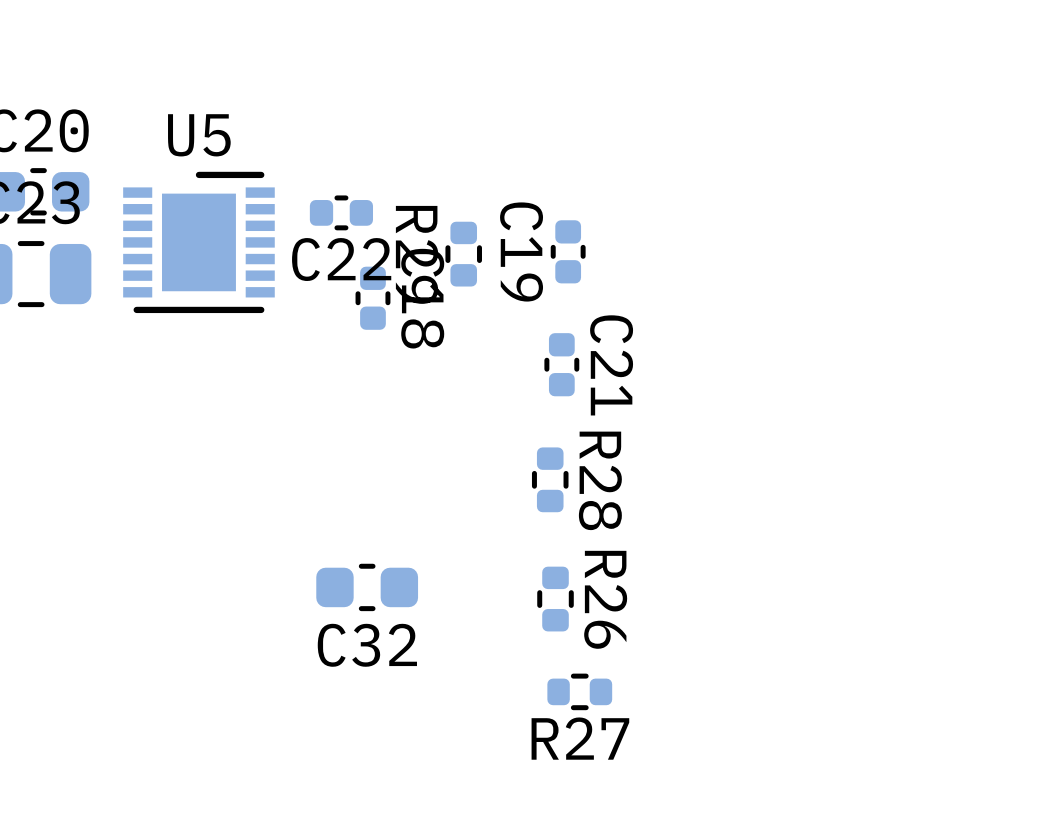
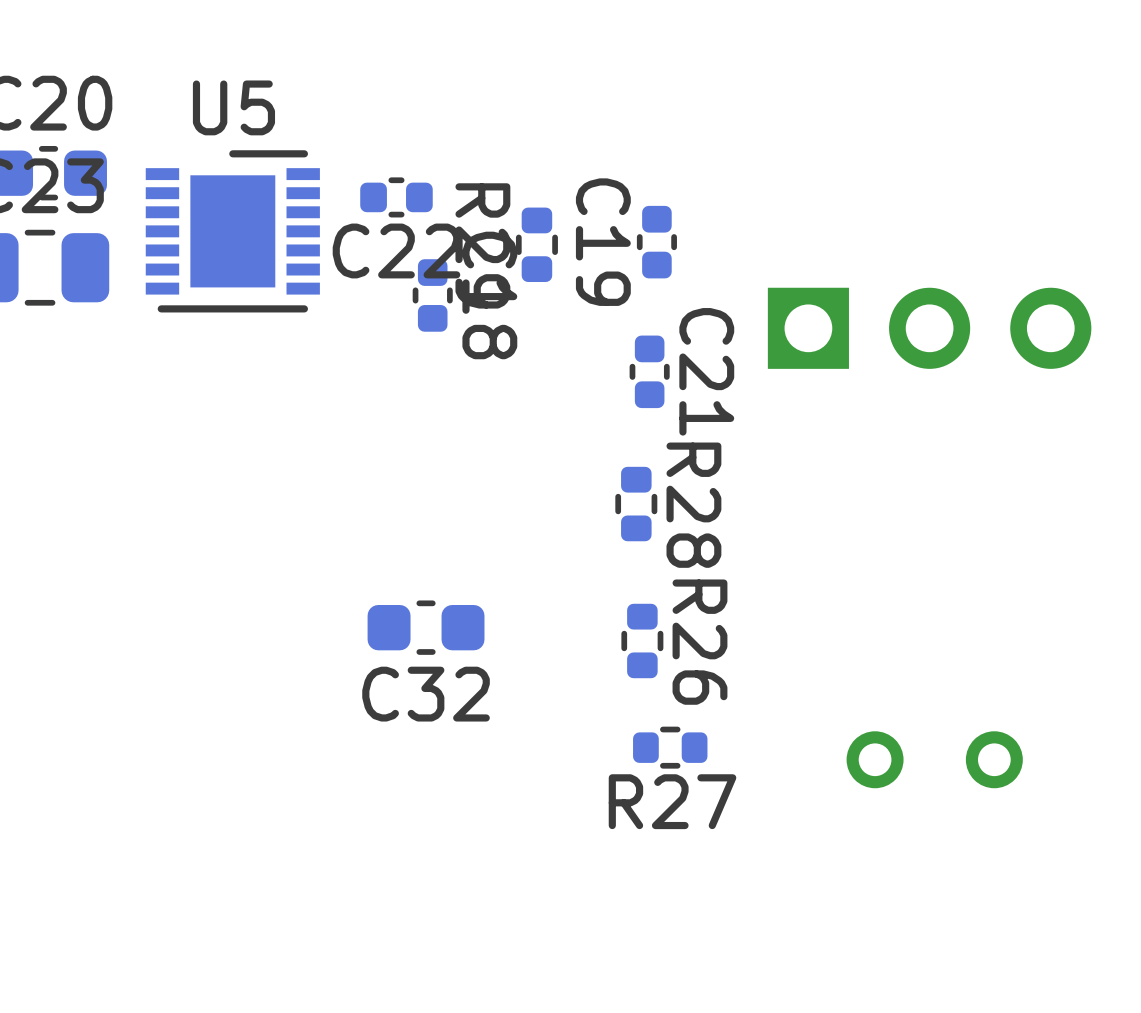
part: none -> (929, 328)
part: none -> (934, 759)

